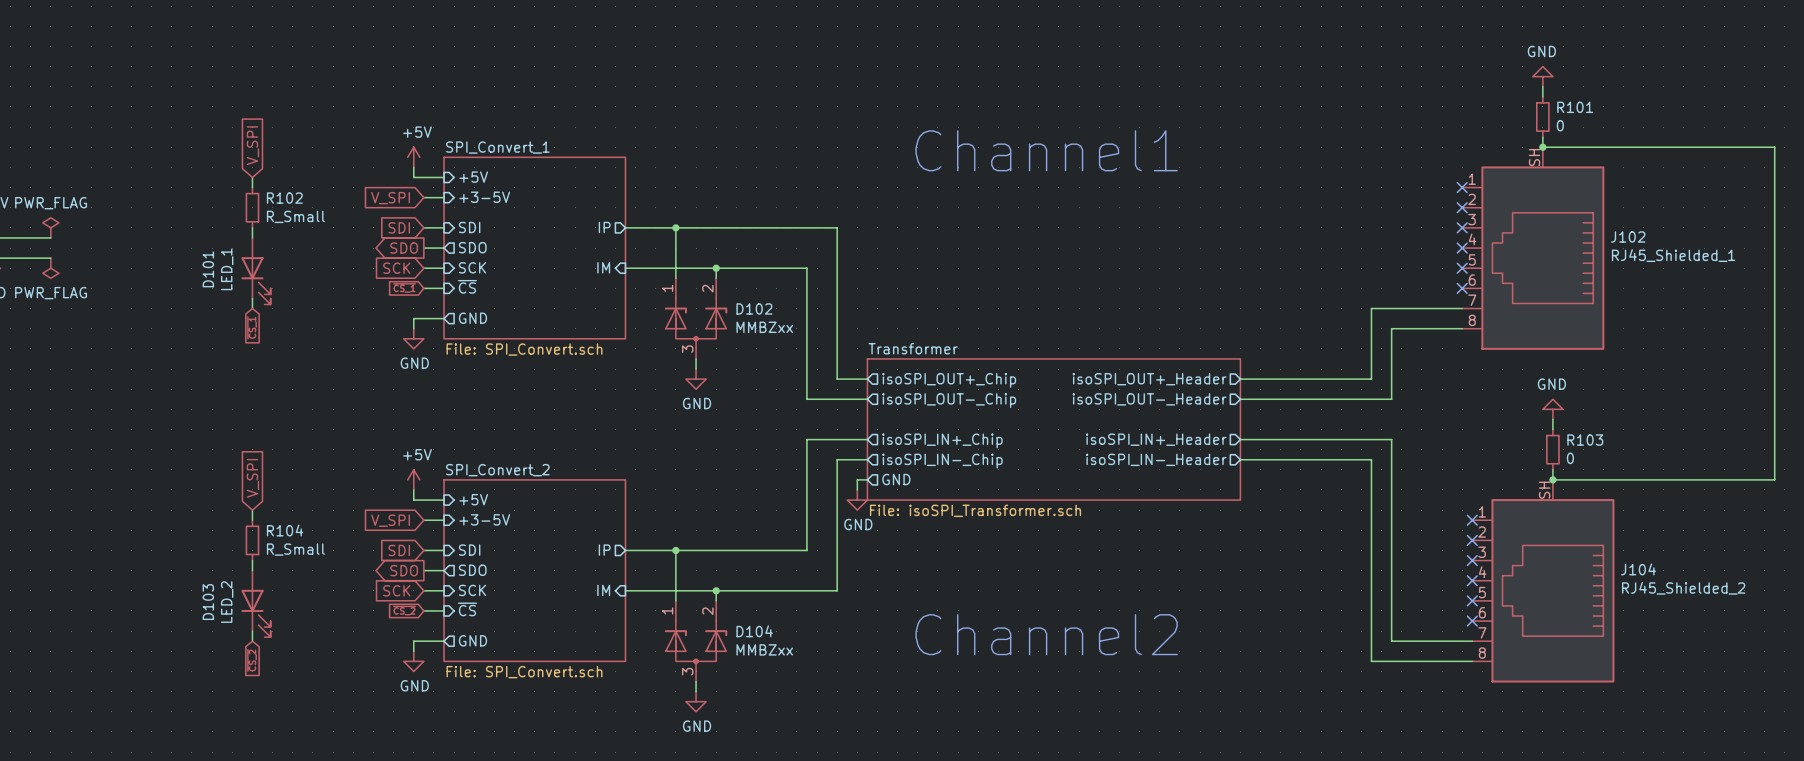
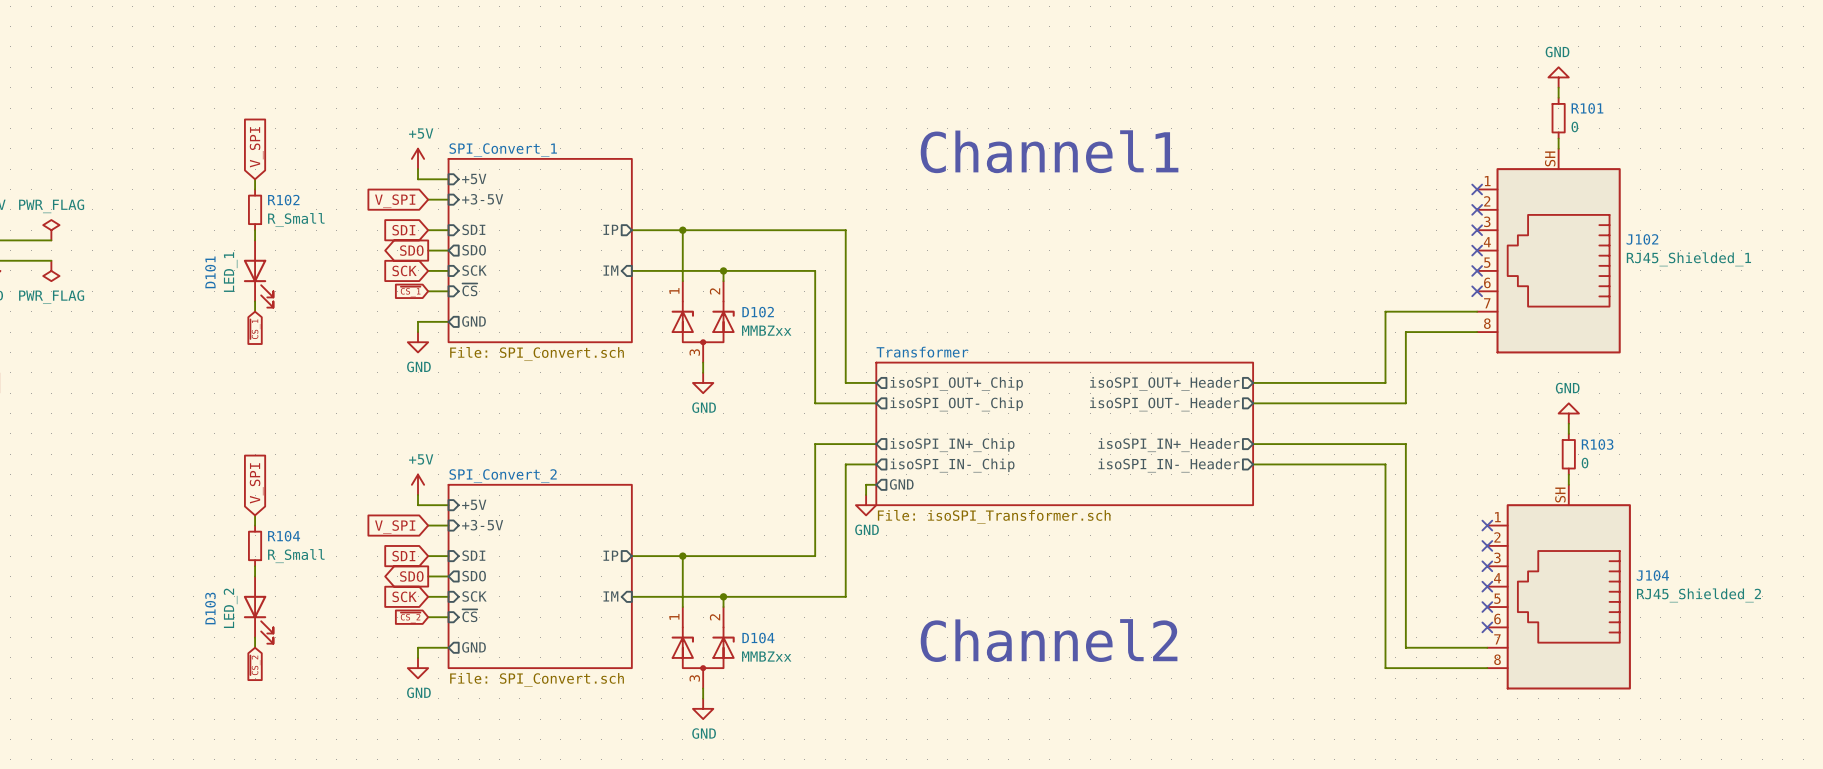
wire: (1542, 147) (1774, 147) (1774, 479) (1552, 479) -> none
junction: (1542, 147) -> none
junction: (1552, 479) -> none

